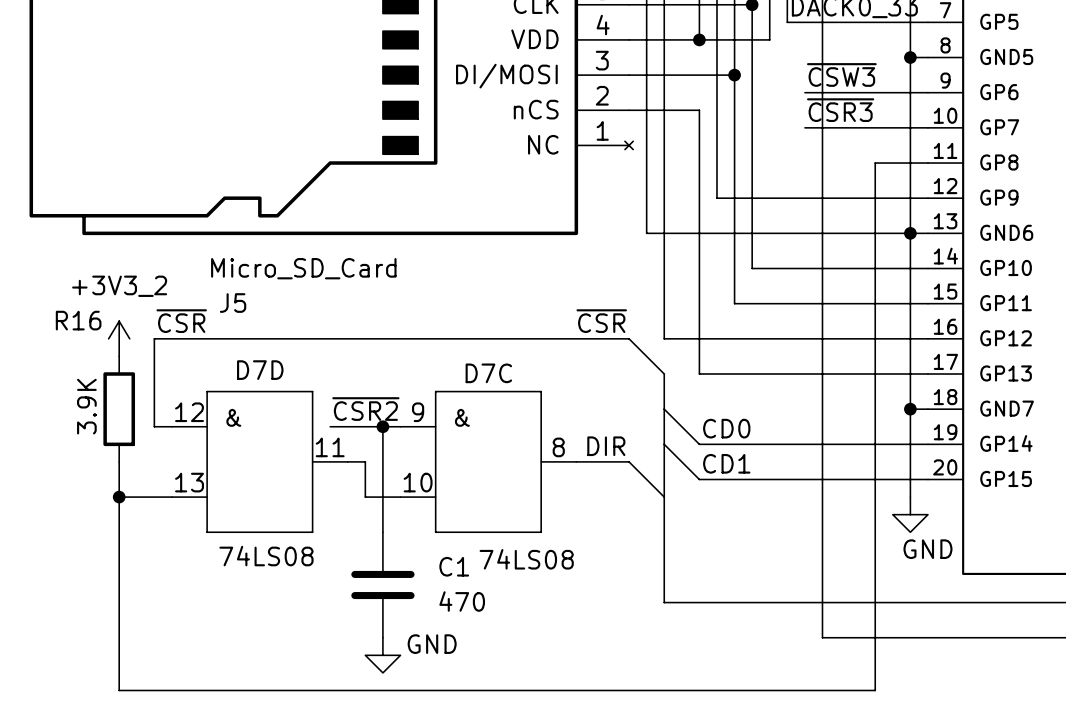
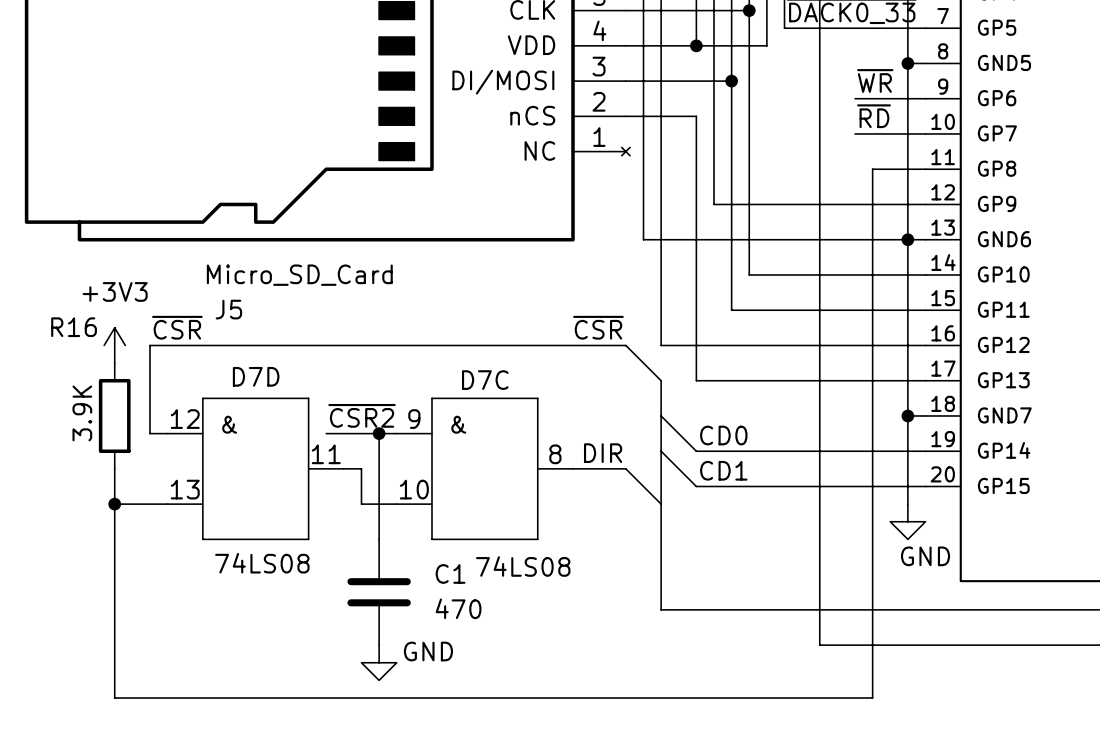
label: ~{CSW3} (841, 74) -> none
label: none -> ~{WR} (875, 80)
wire: (804, 92) (857, 92) -> none
label: ~{CSR3} (840, 110) -> none
label: none -> ~{RD} (874, 116)
wire: (804, 127) (857, 127) -> none
power symbol: +3V3_2 (119, 338) -> +3V3 (114, 345)

